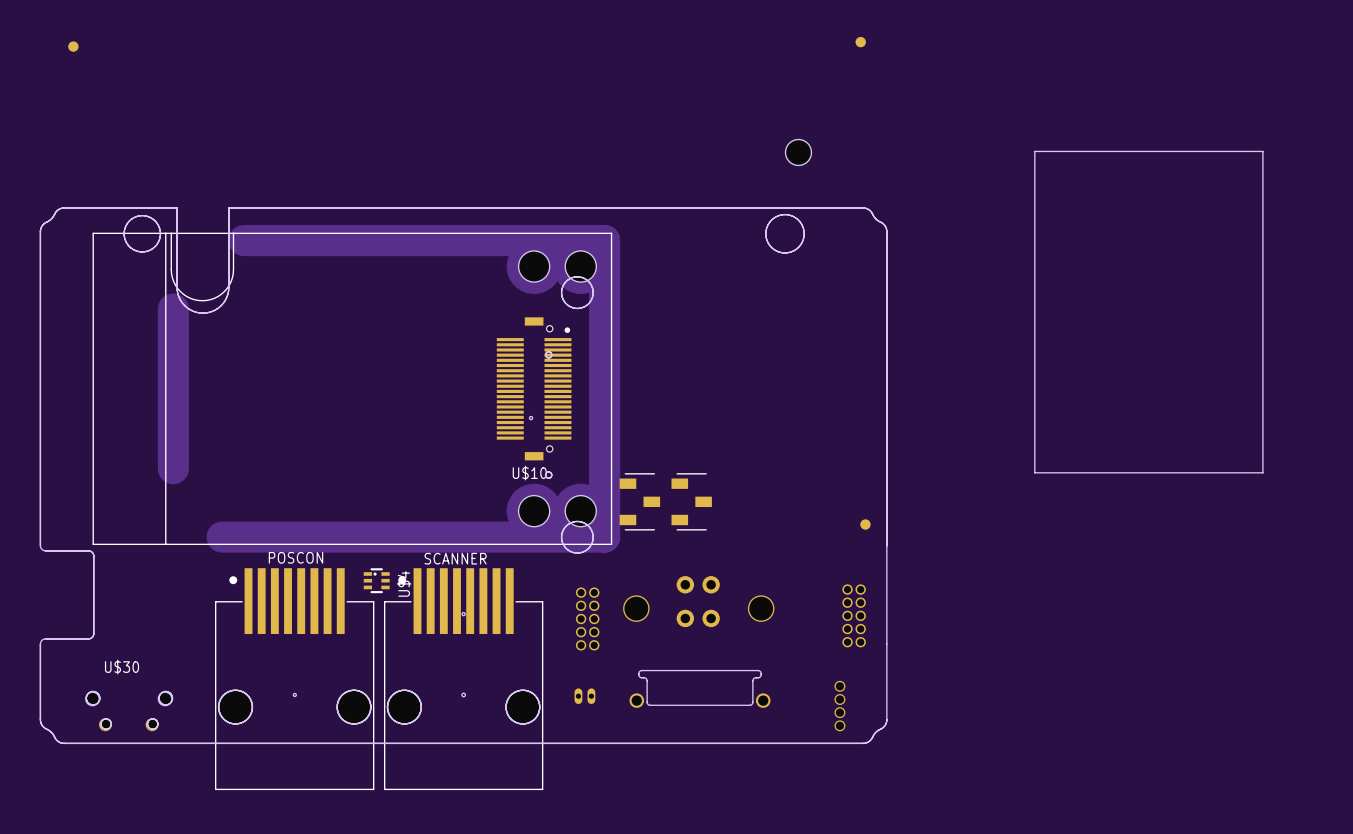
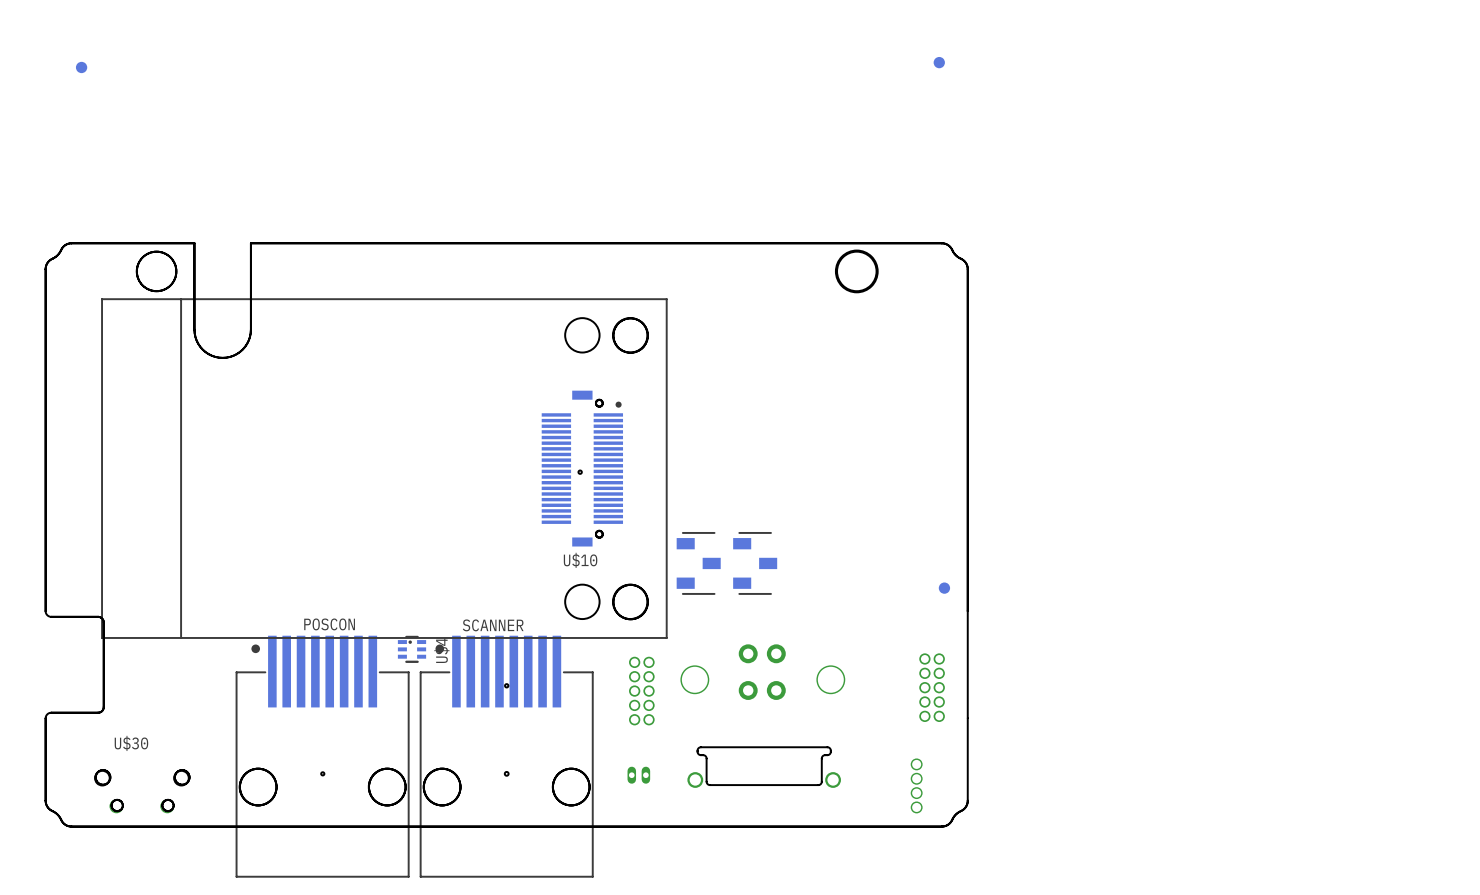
board edge: (1262, 151) (1034, 151) (1034, 472) (1262, 472) (1262, 151) -> none
hole: (798, 152) -> none
round board edge: none -> [836, 251, 878, 292]
U$10 footprint: [92, 225, 621, 553] -> [101, 298, 668, 639]

